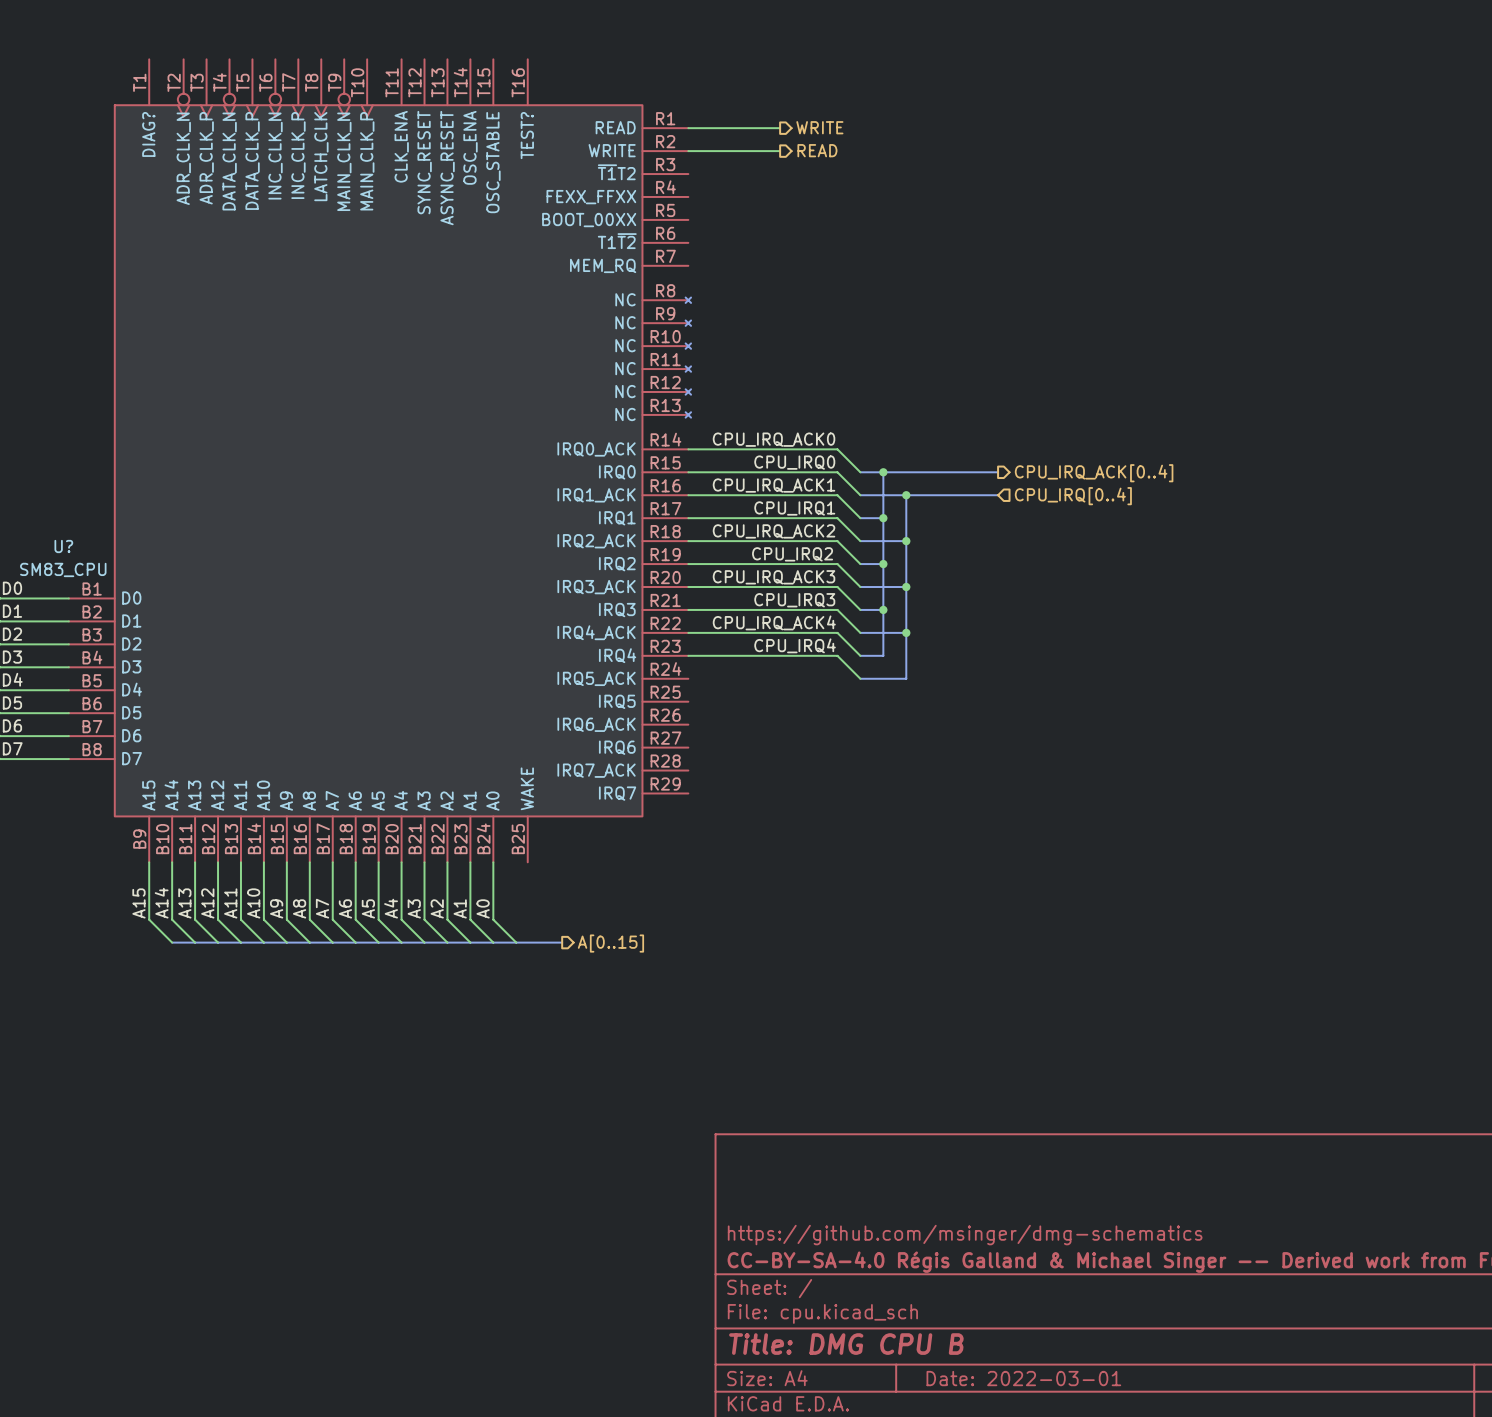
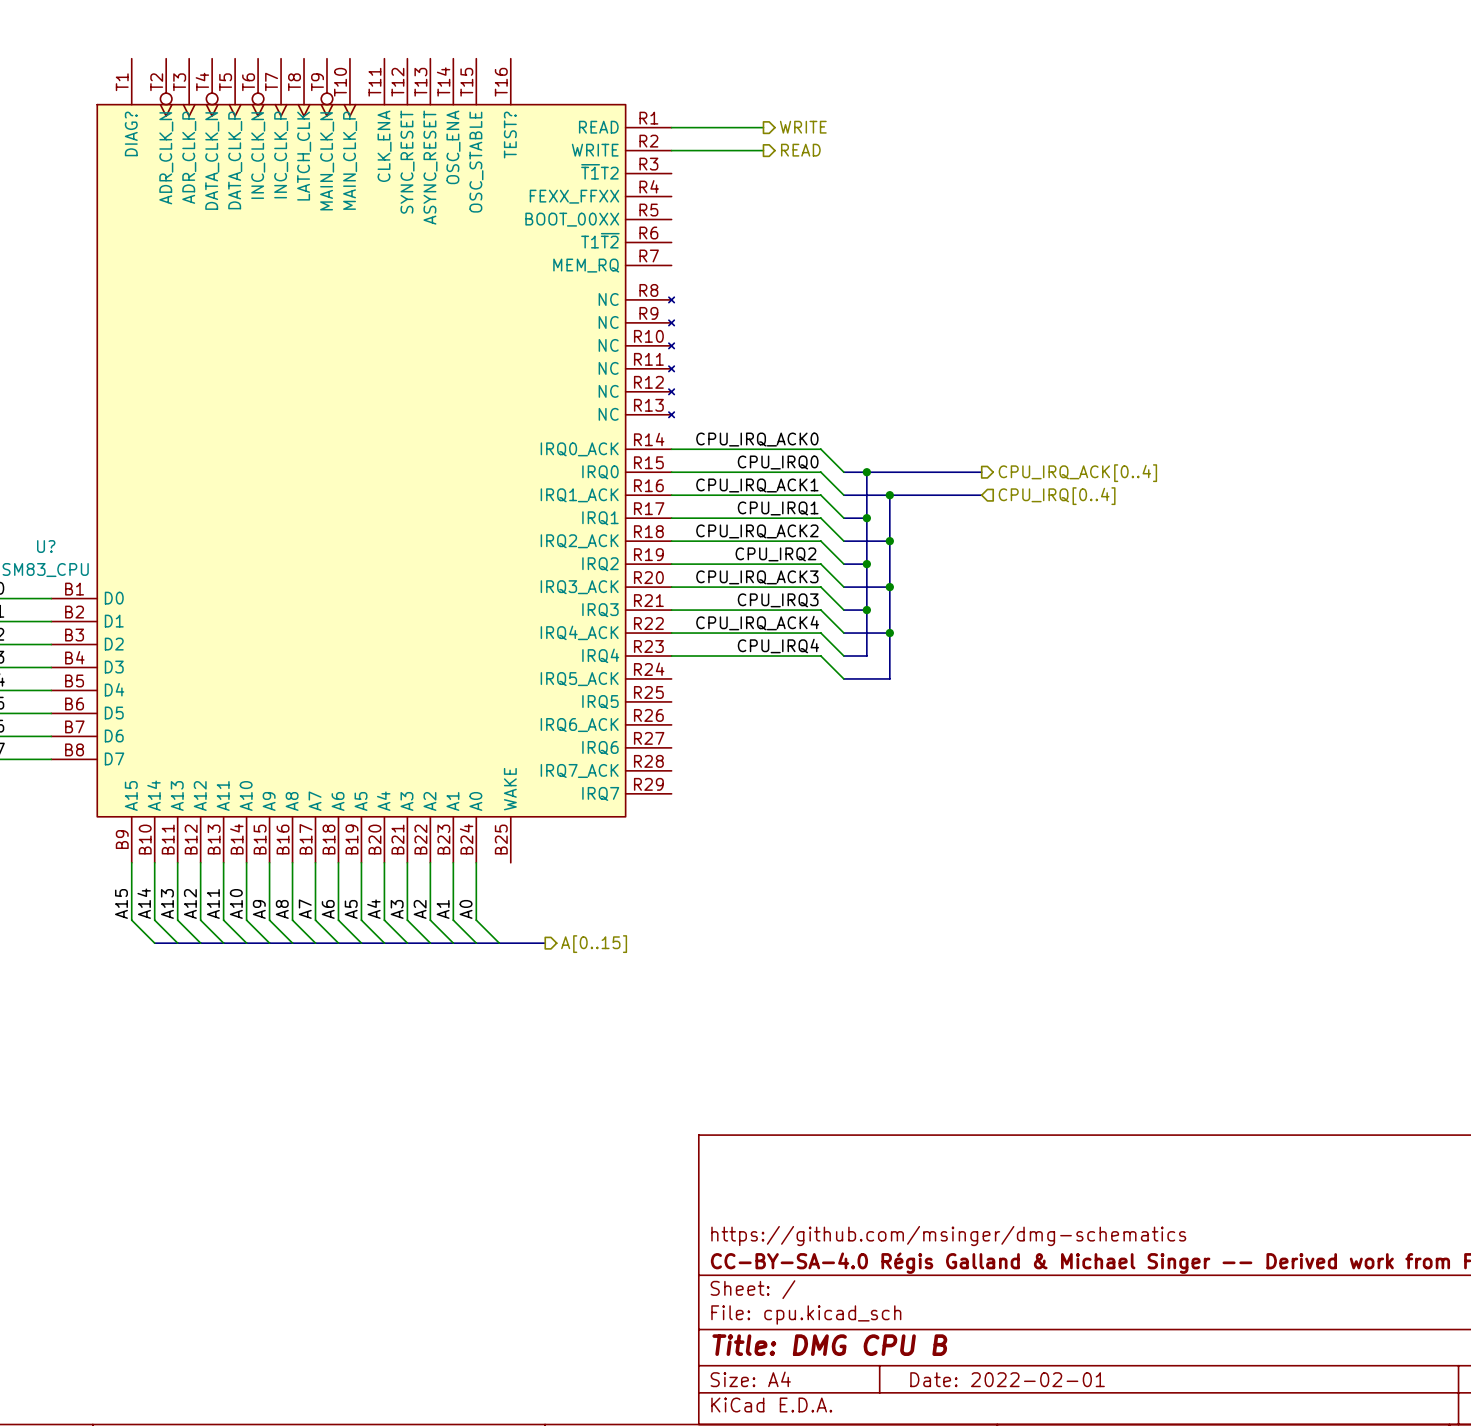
title block: Date: 2022-03-01 (1023, 1378) -> Date: 2022-02-01 (1007, 1379)

